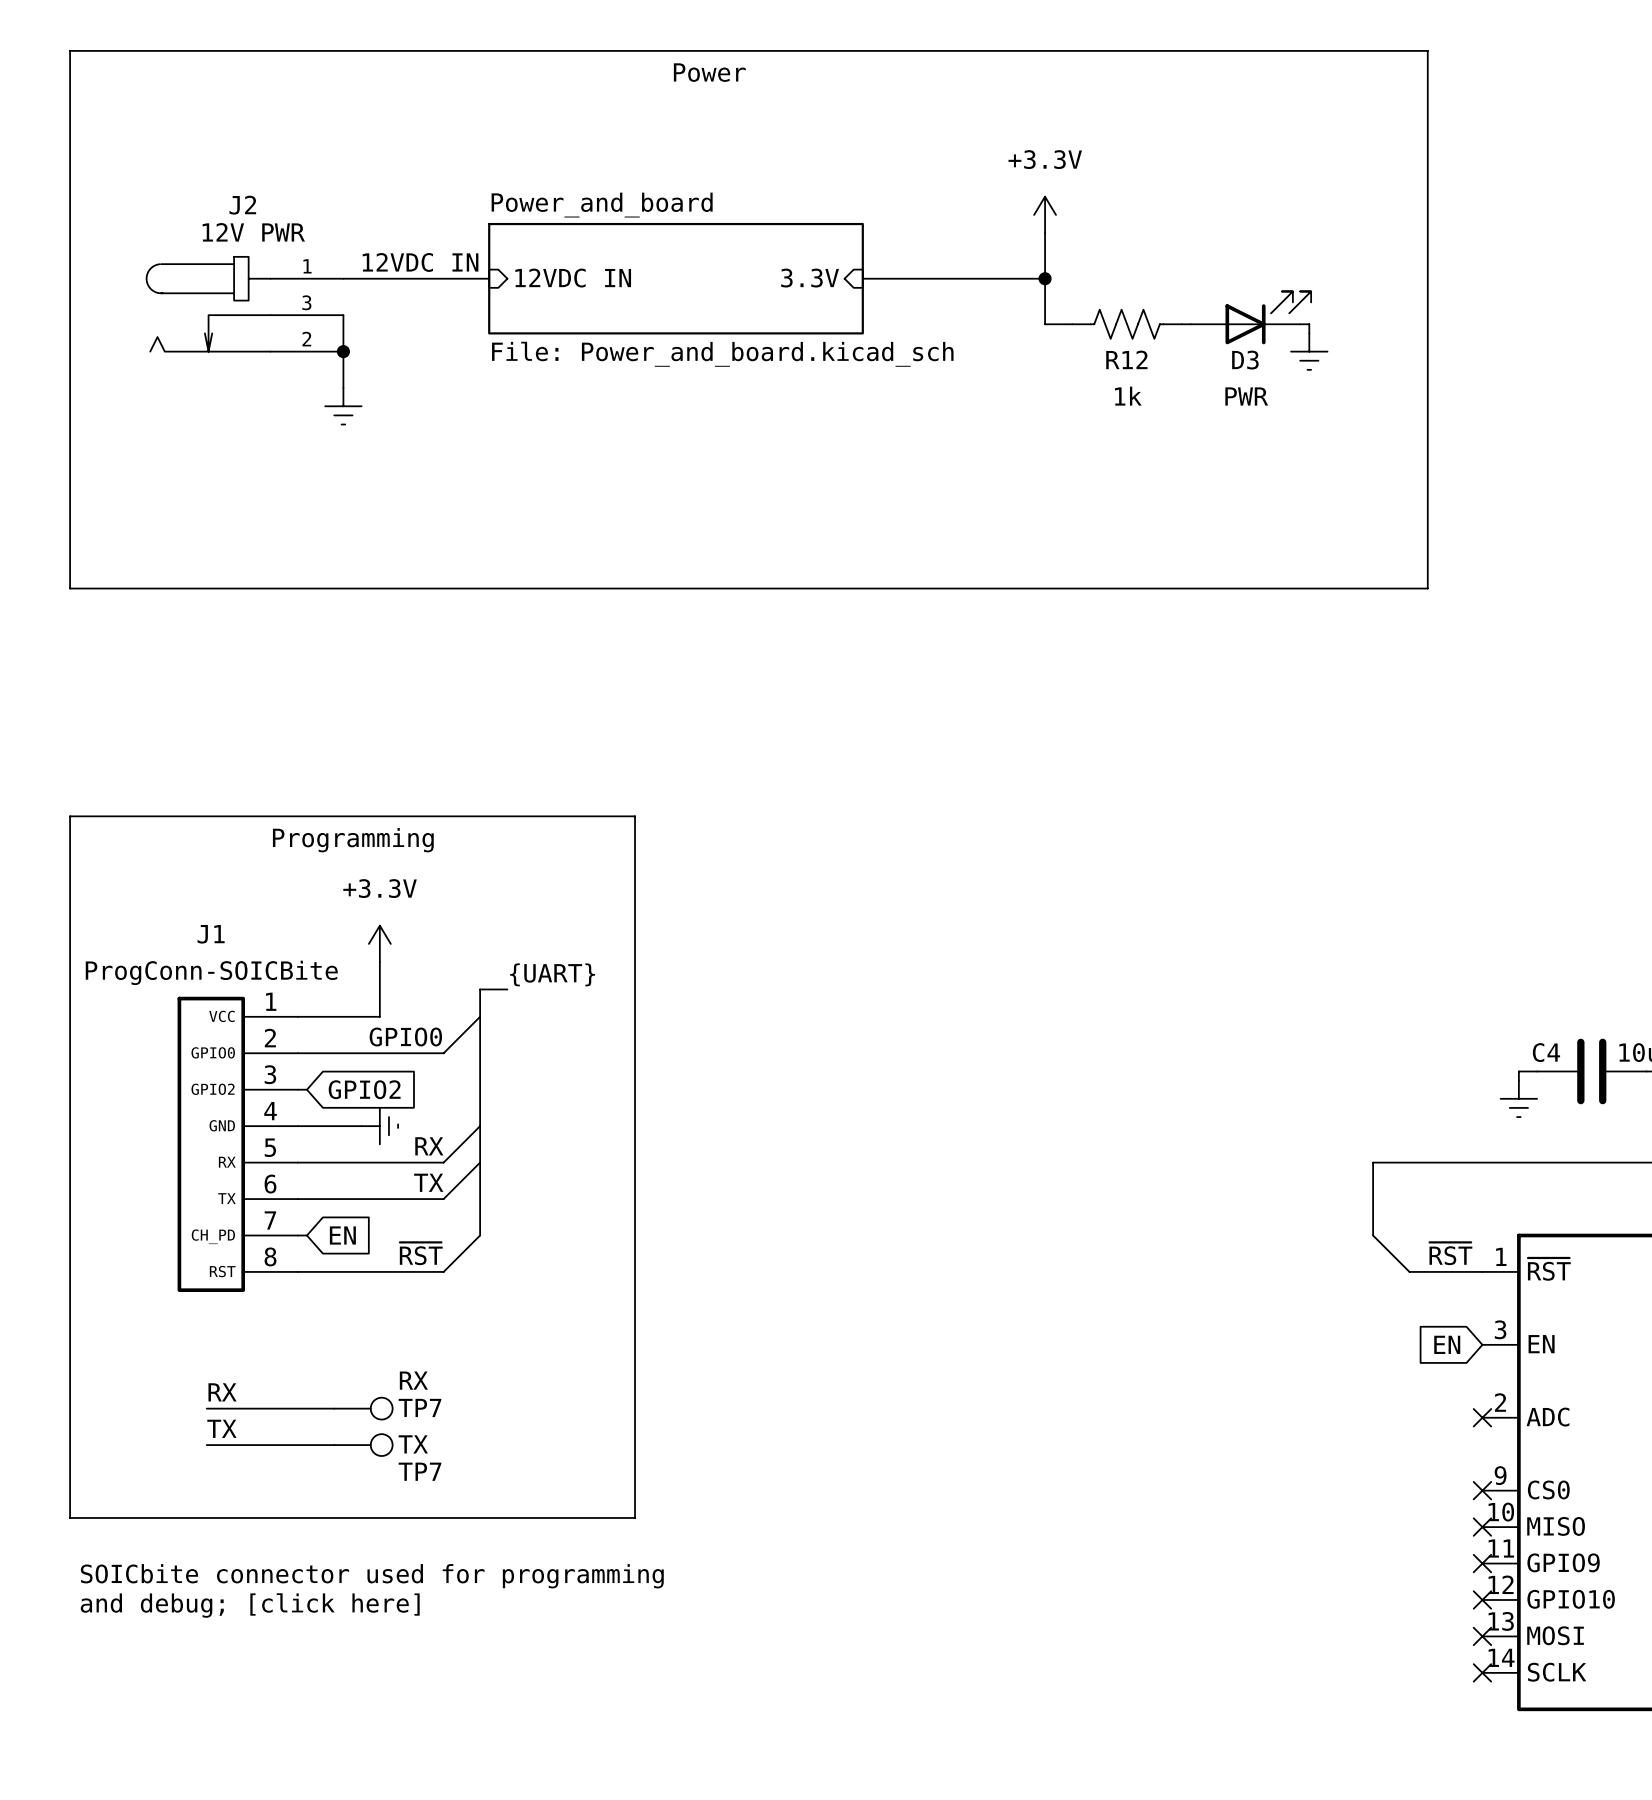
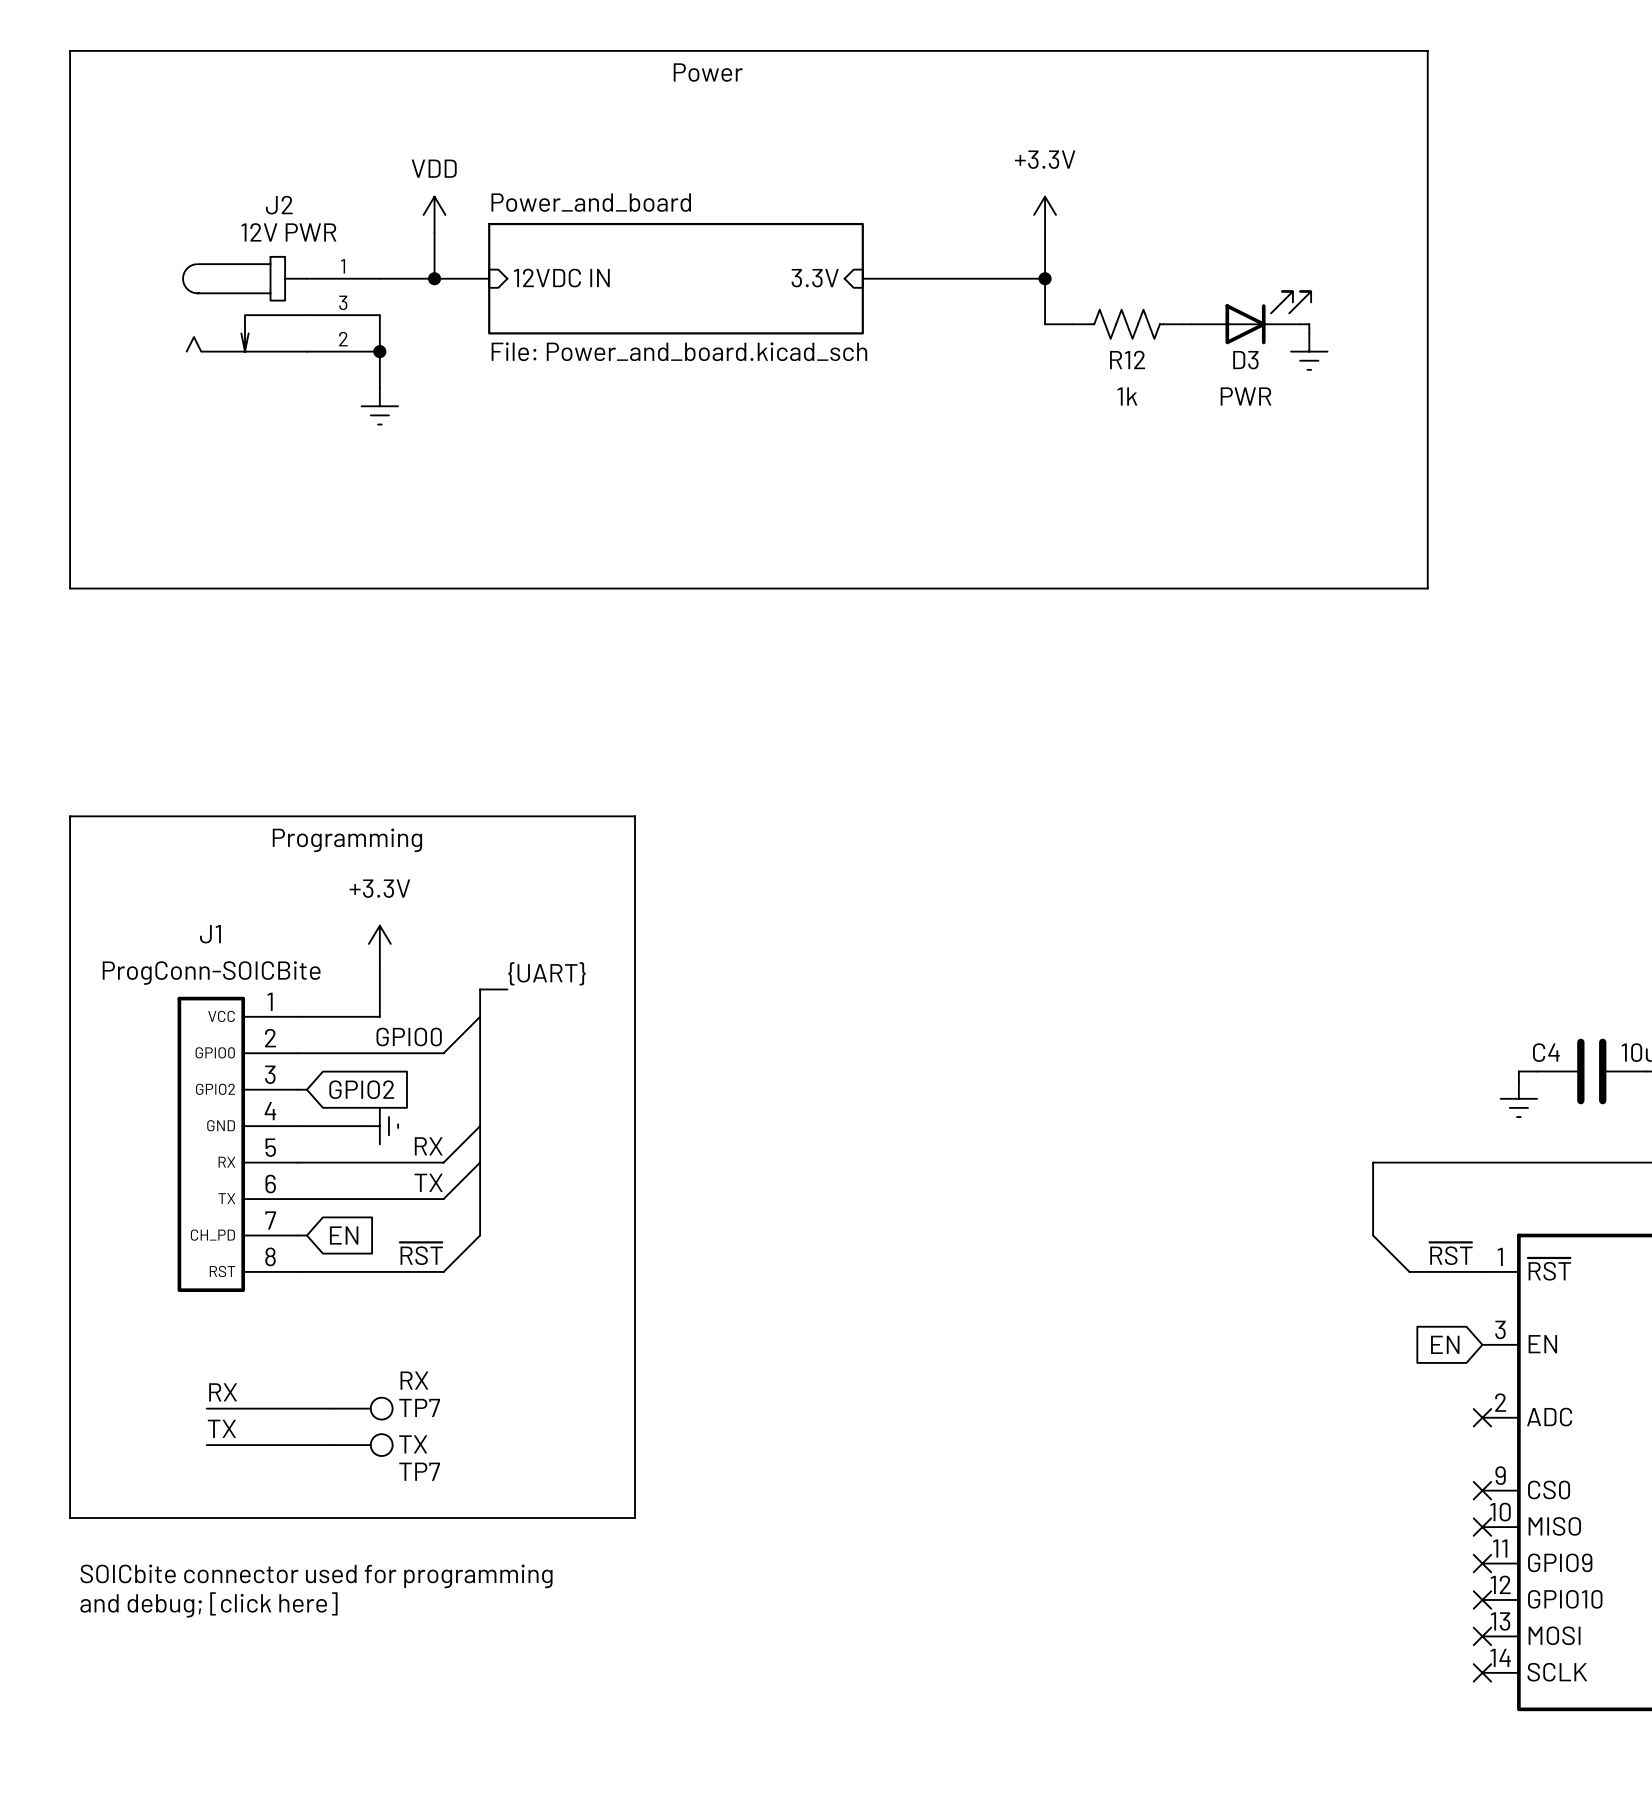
power symbol: none -> VDD (434, 214)
wire: none -> (434, 233) (434, 278)
label: 12VDC IN (420, 262) -> none
junction: none -> (434, 278)
J2 position: (245, 304) -> (281, 304)
wire: (343, 315) (343, 388) -> (379, 315) (379, 388)
junction position: (343, 351) -> (379, 351)
power symbol position: (343, 406) -> (379, 406)

